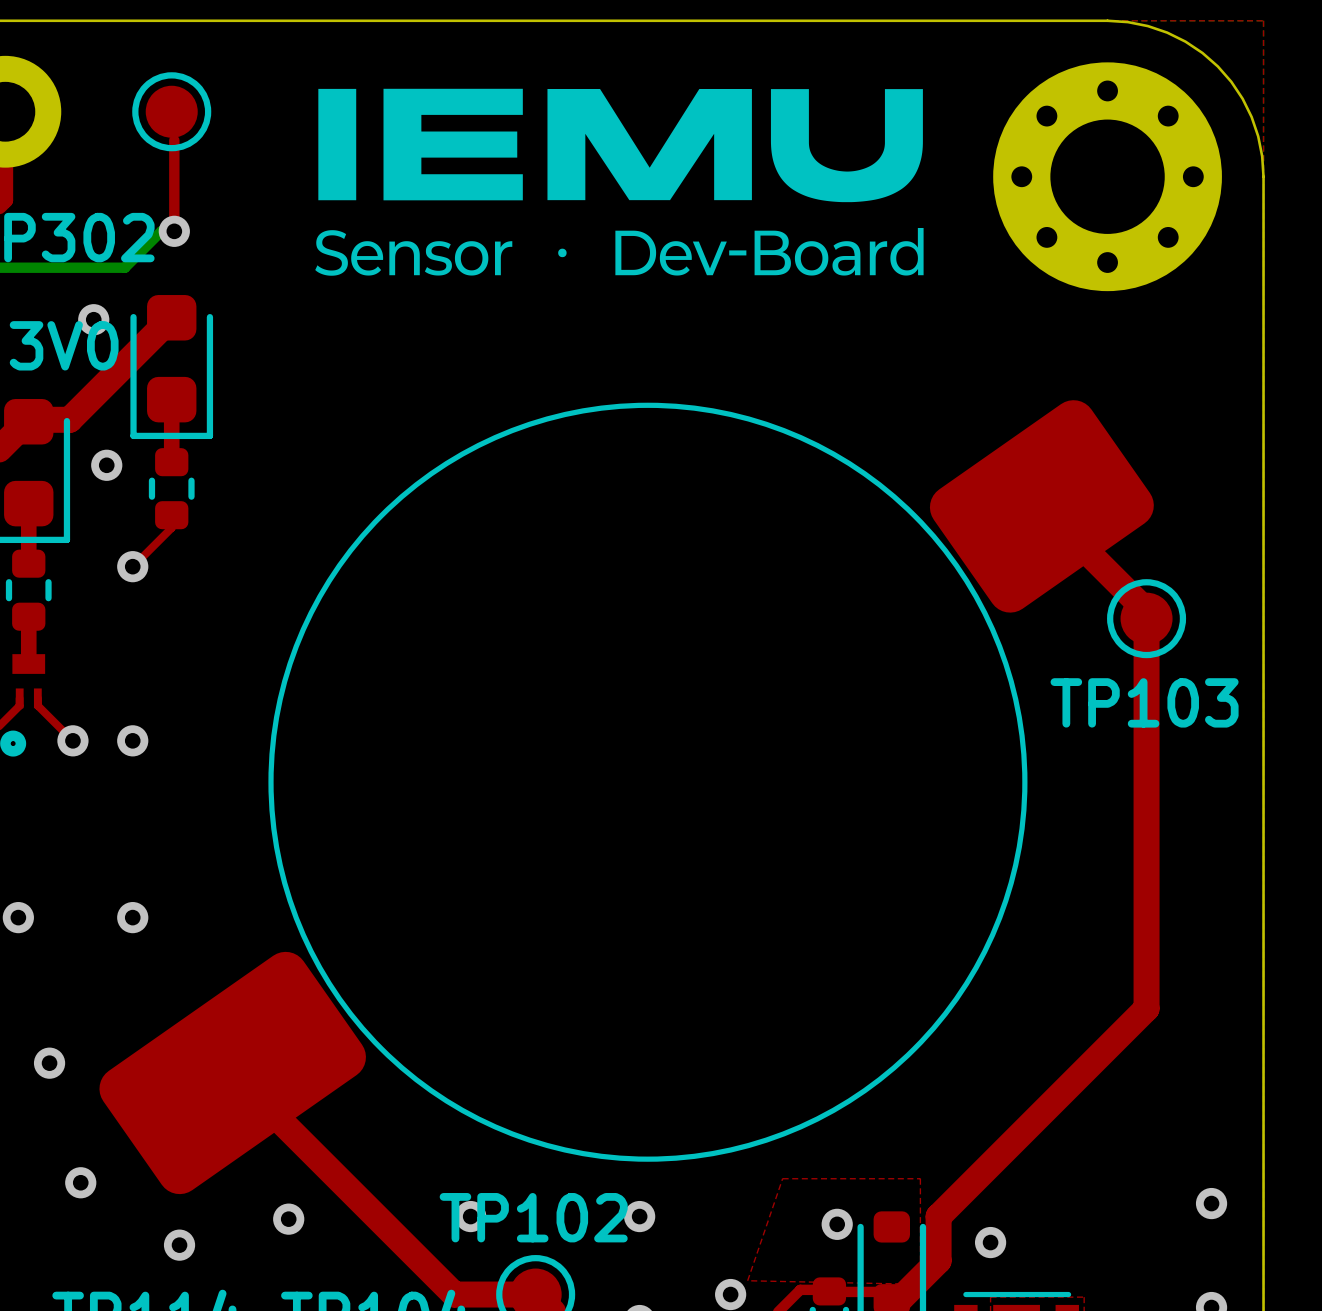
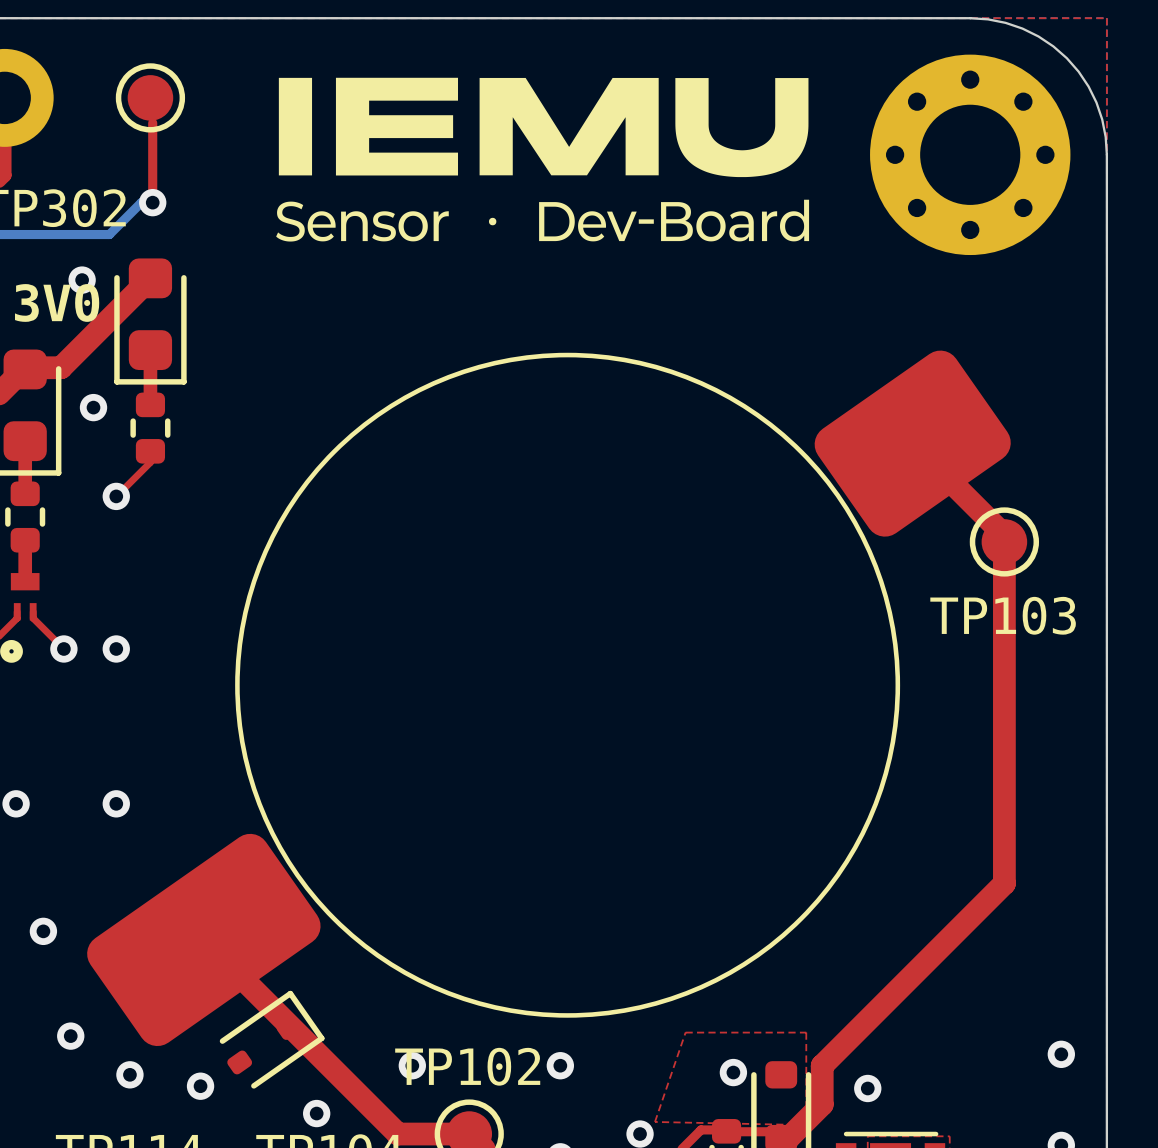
part: none -> (272, 1039)
via: (288, 1219) -> none
via: none -> (129, 1074)
via: none -> (200, 1086)
via: (179, 1245) -> none
via: none -> (316, 1113)

